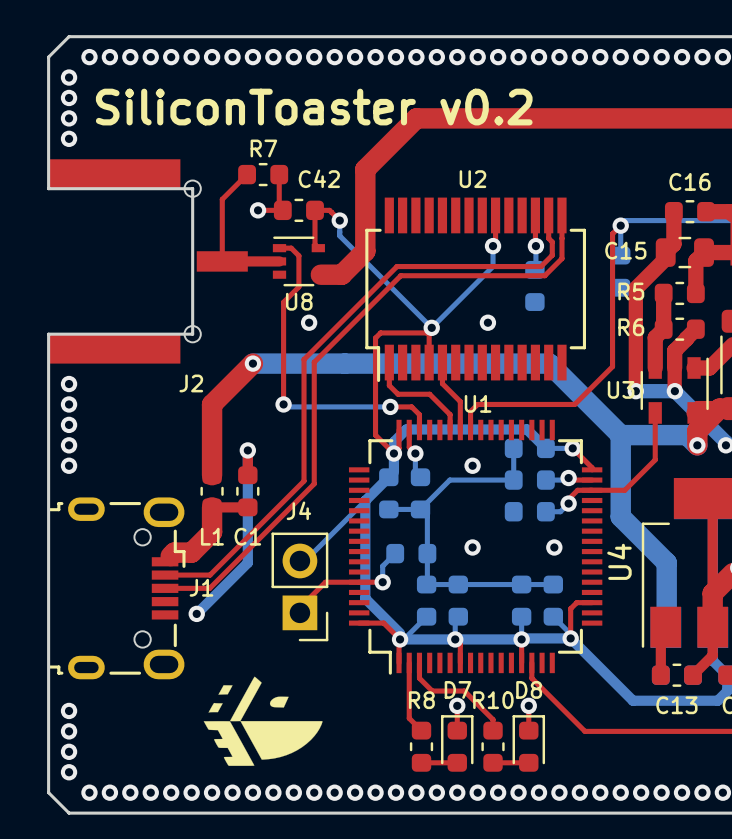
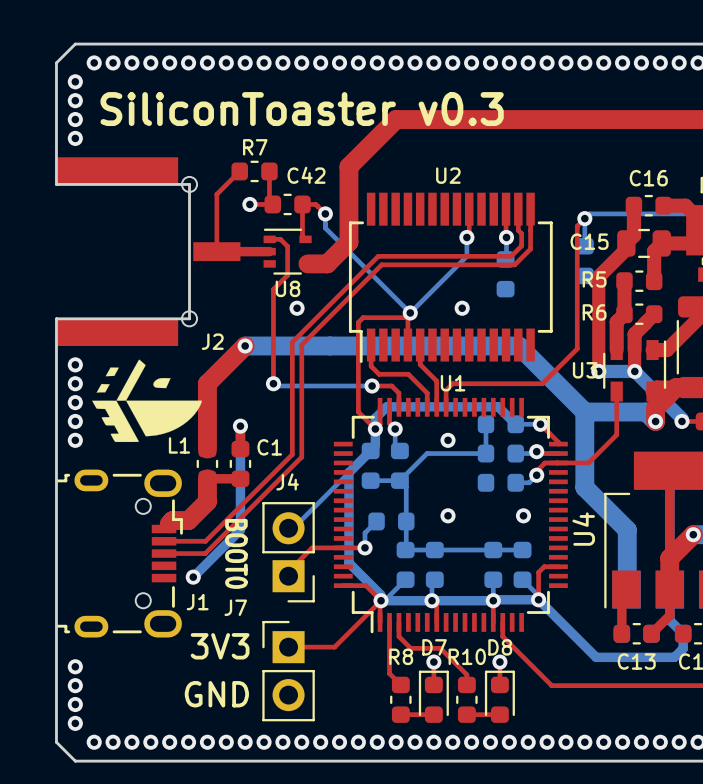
text: SiliconToaster v0.2 (314, 107) -> SiliconToaster v0.3 (302, 109)
J2 name position: J2 (191, 383) -> J2 (212, 341)
L1 name position: L1 (212, 536) -> L1 (179, 445)
C1 name position: C1 (247, 536) -> C1 (269, 447)
J1 name position: J1 (201, 587) -> J1 (197, 602)
text: none -> BOOT0 (236, 553)
top track: none -> (380, 601) (334, 647) (288, 647)
text: none -> 3V3 (220, 646)
J7: none -> (288, 671)
drawing position: (263, 721) -> (146, 400)
text: none -> GND (216, 694)

